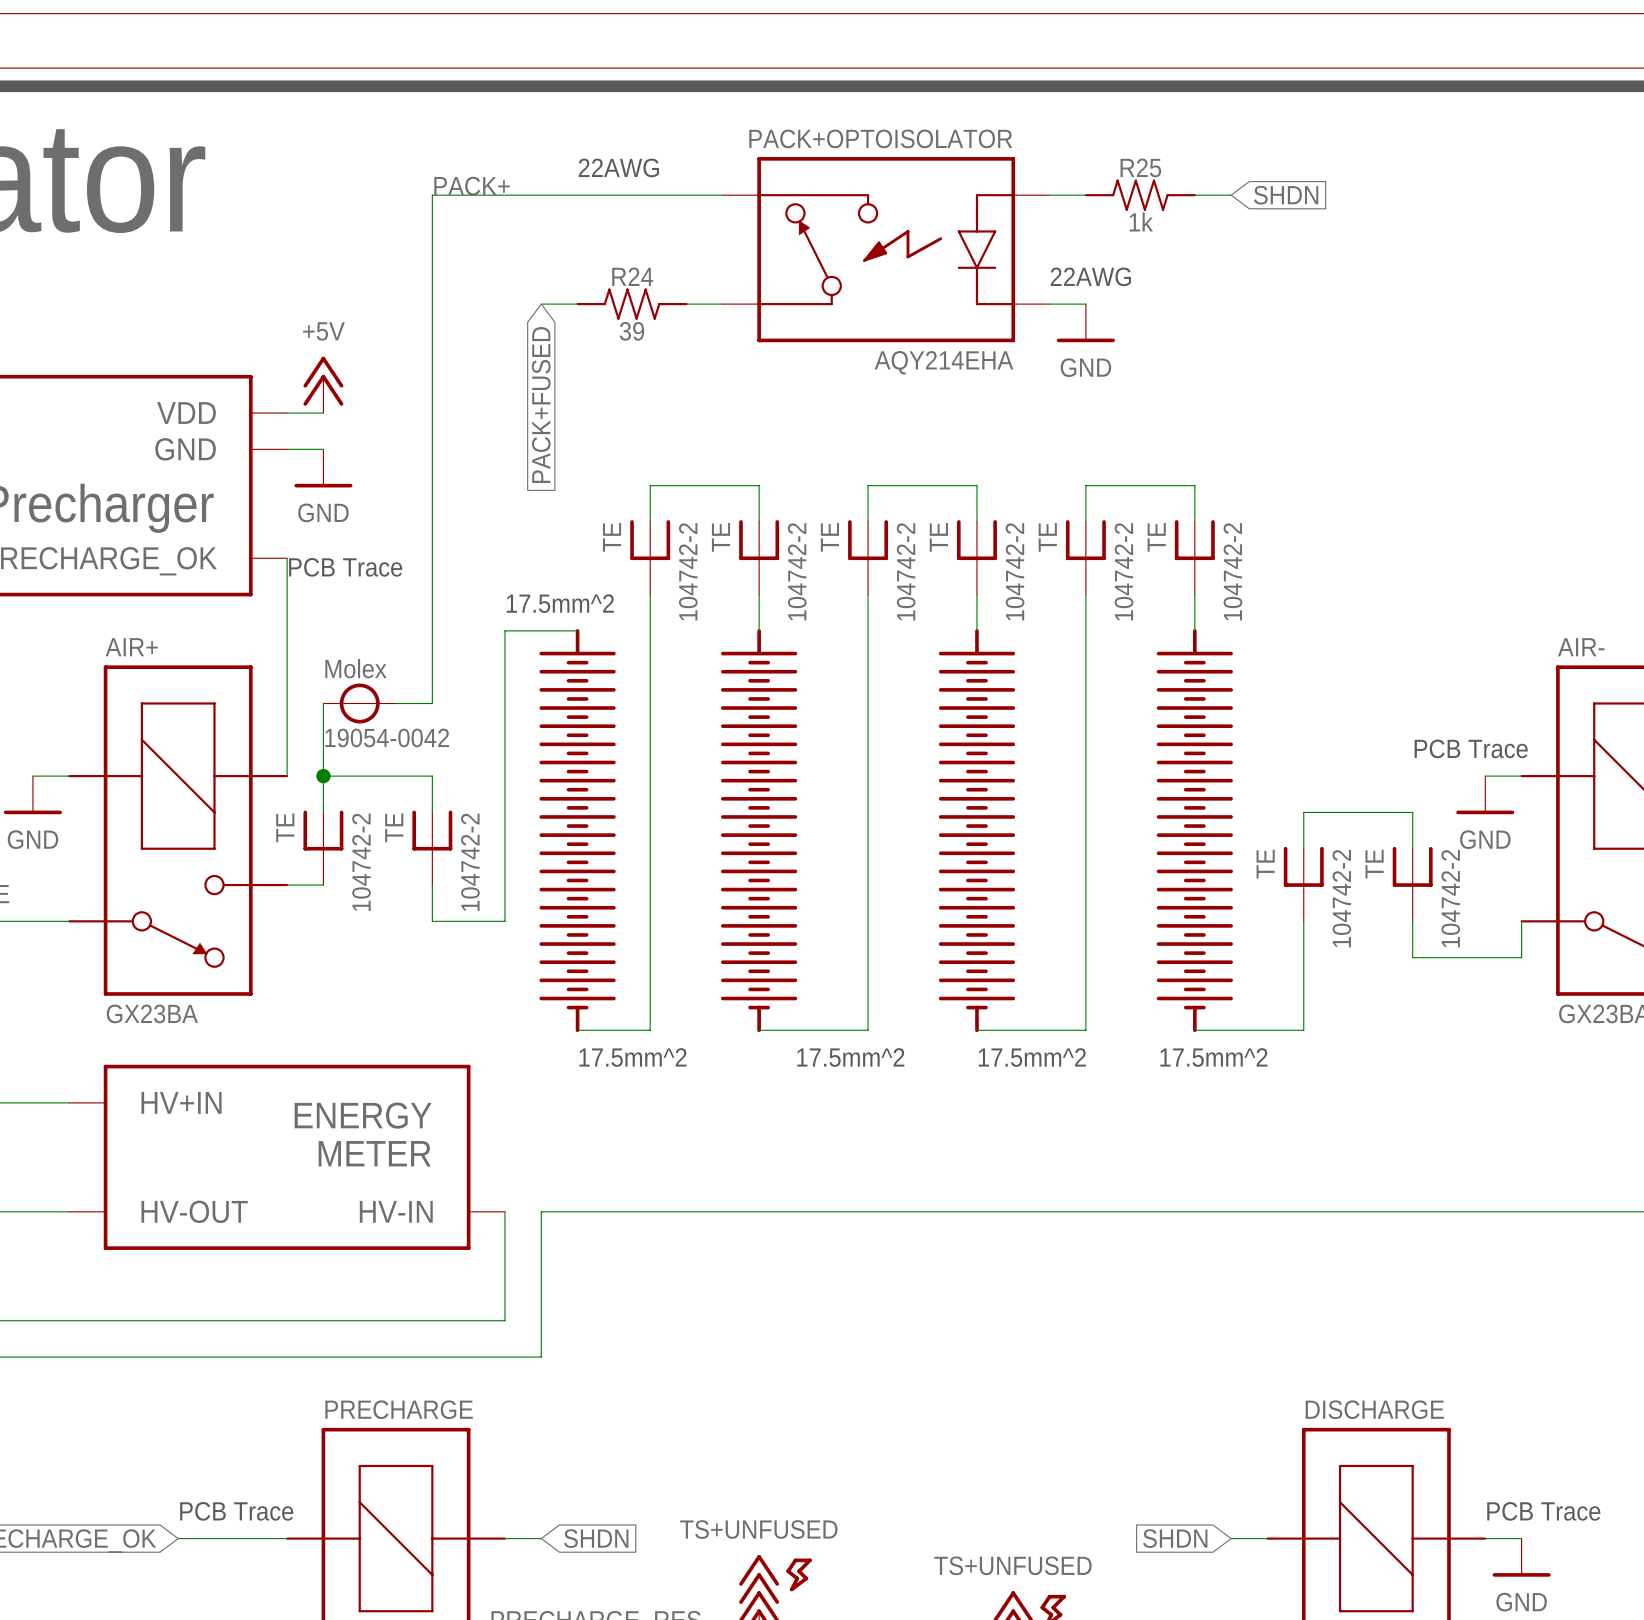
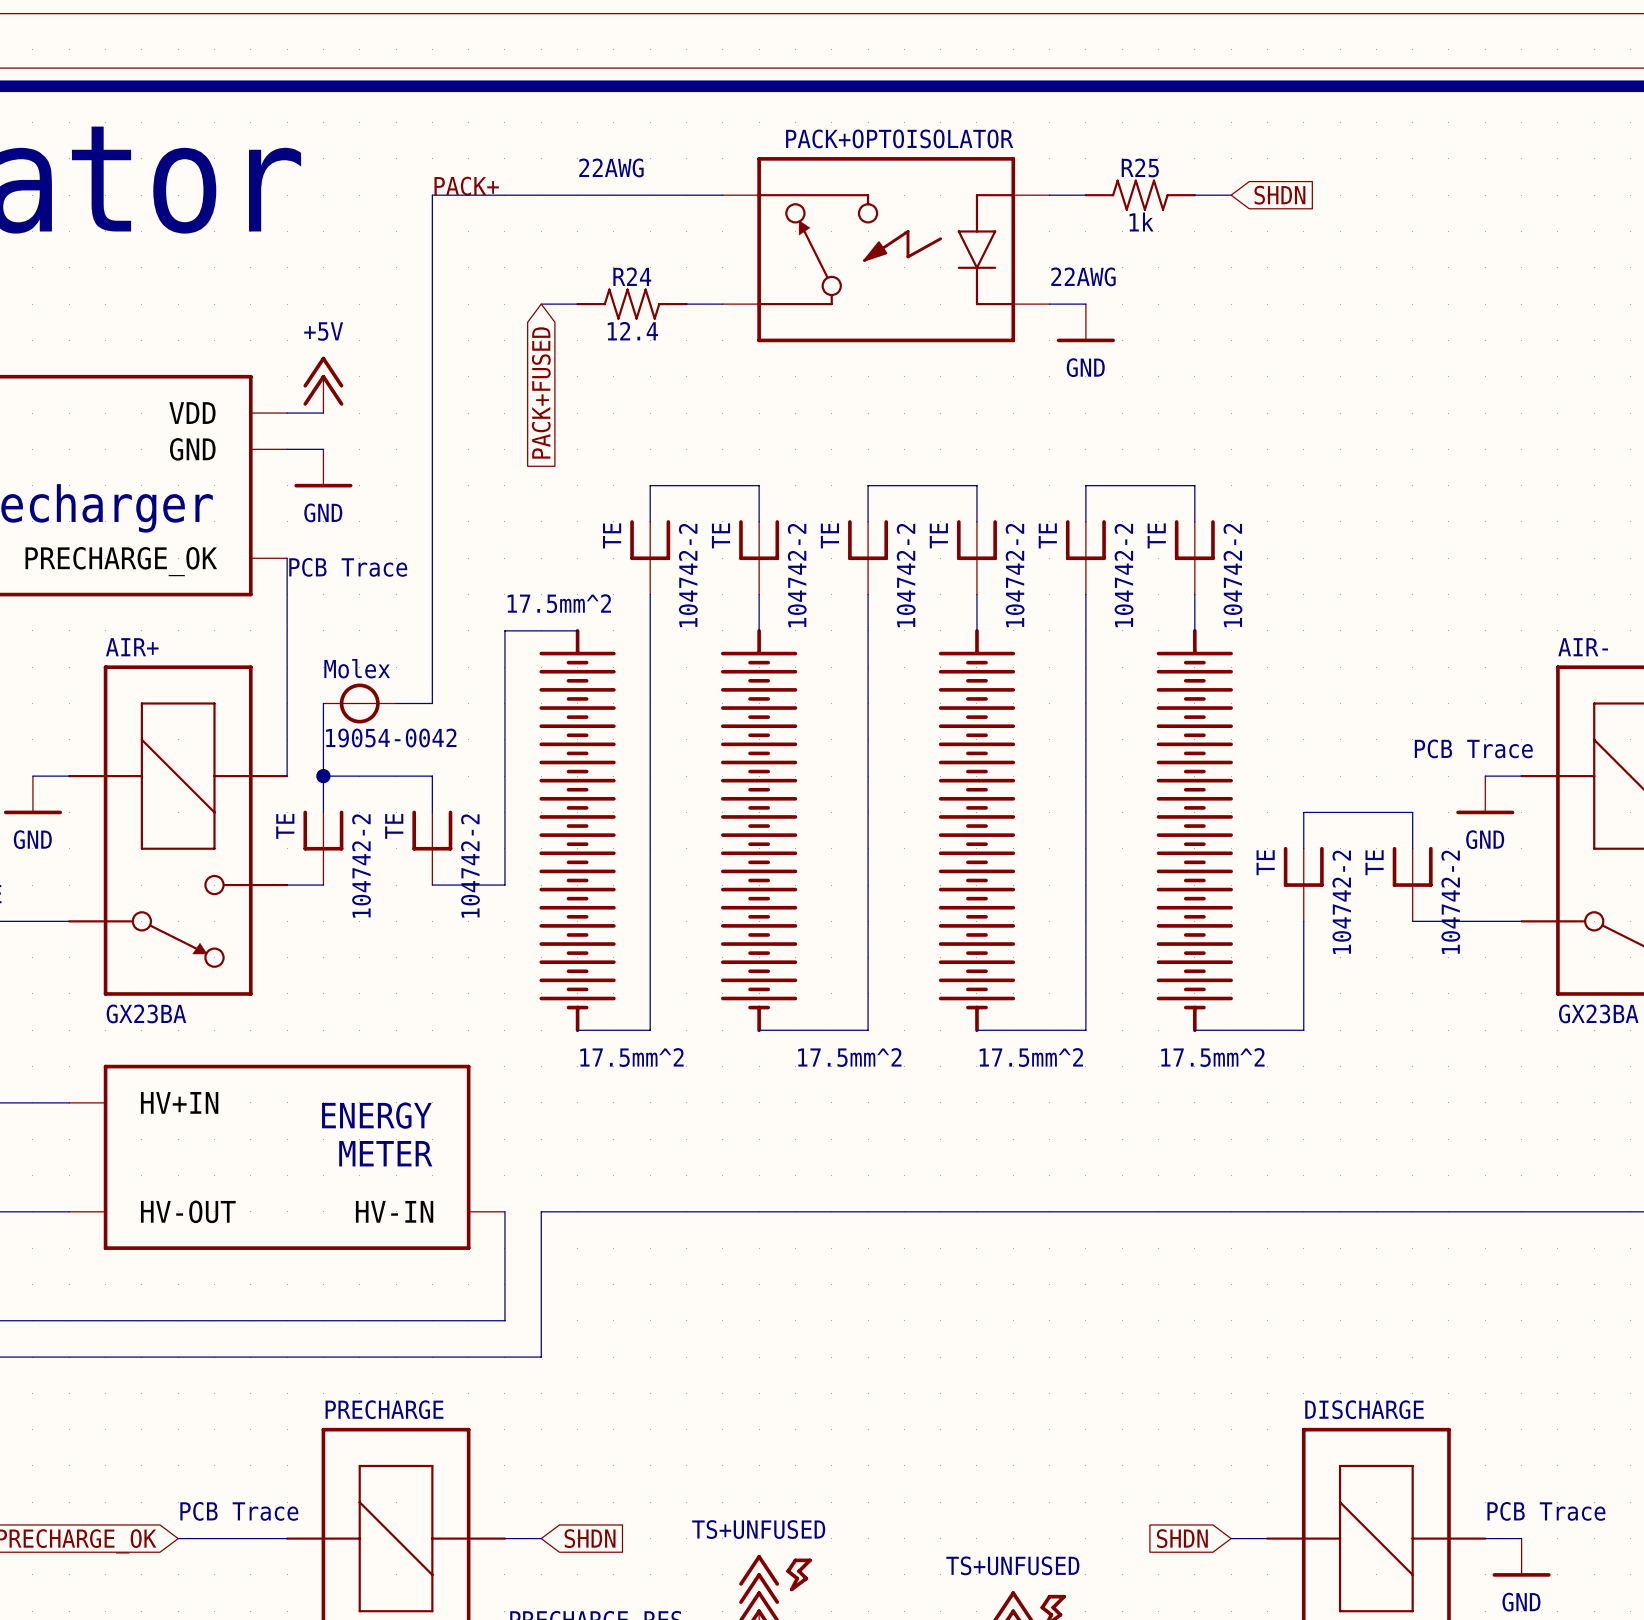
R24 value: 39 (631, 331) -> 12.4 (632, 331)
PACK+OPTOISOLATOR text: AQY214EHA (943, 362) -> none
wire: (432, 885) (432, 921) (504, 921) (504, 885) -> (432, 885) (504, 885)
wire: (1412, 921) (1412, 957) (1521, 957) (1521, 921) -> (1412, 921) (1521, 921)

